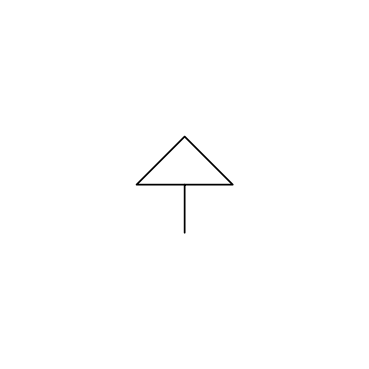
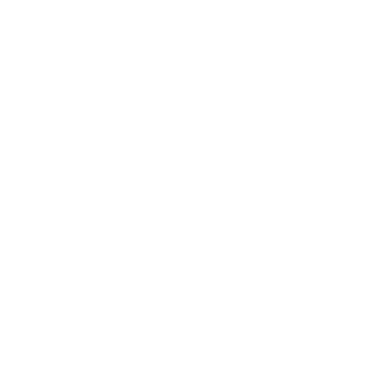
power symbol: (184, 184) -> none

